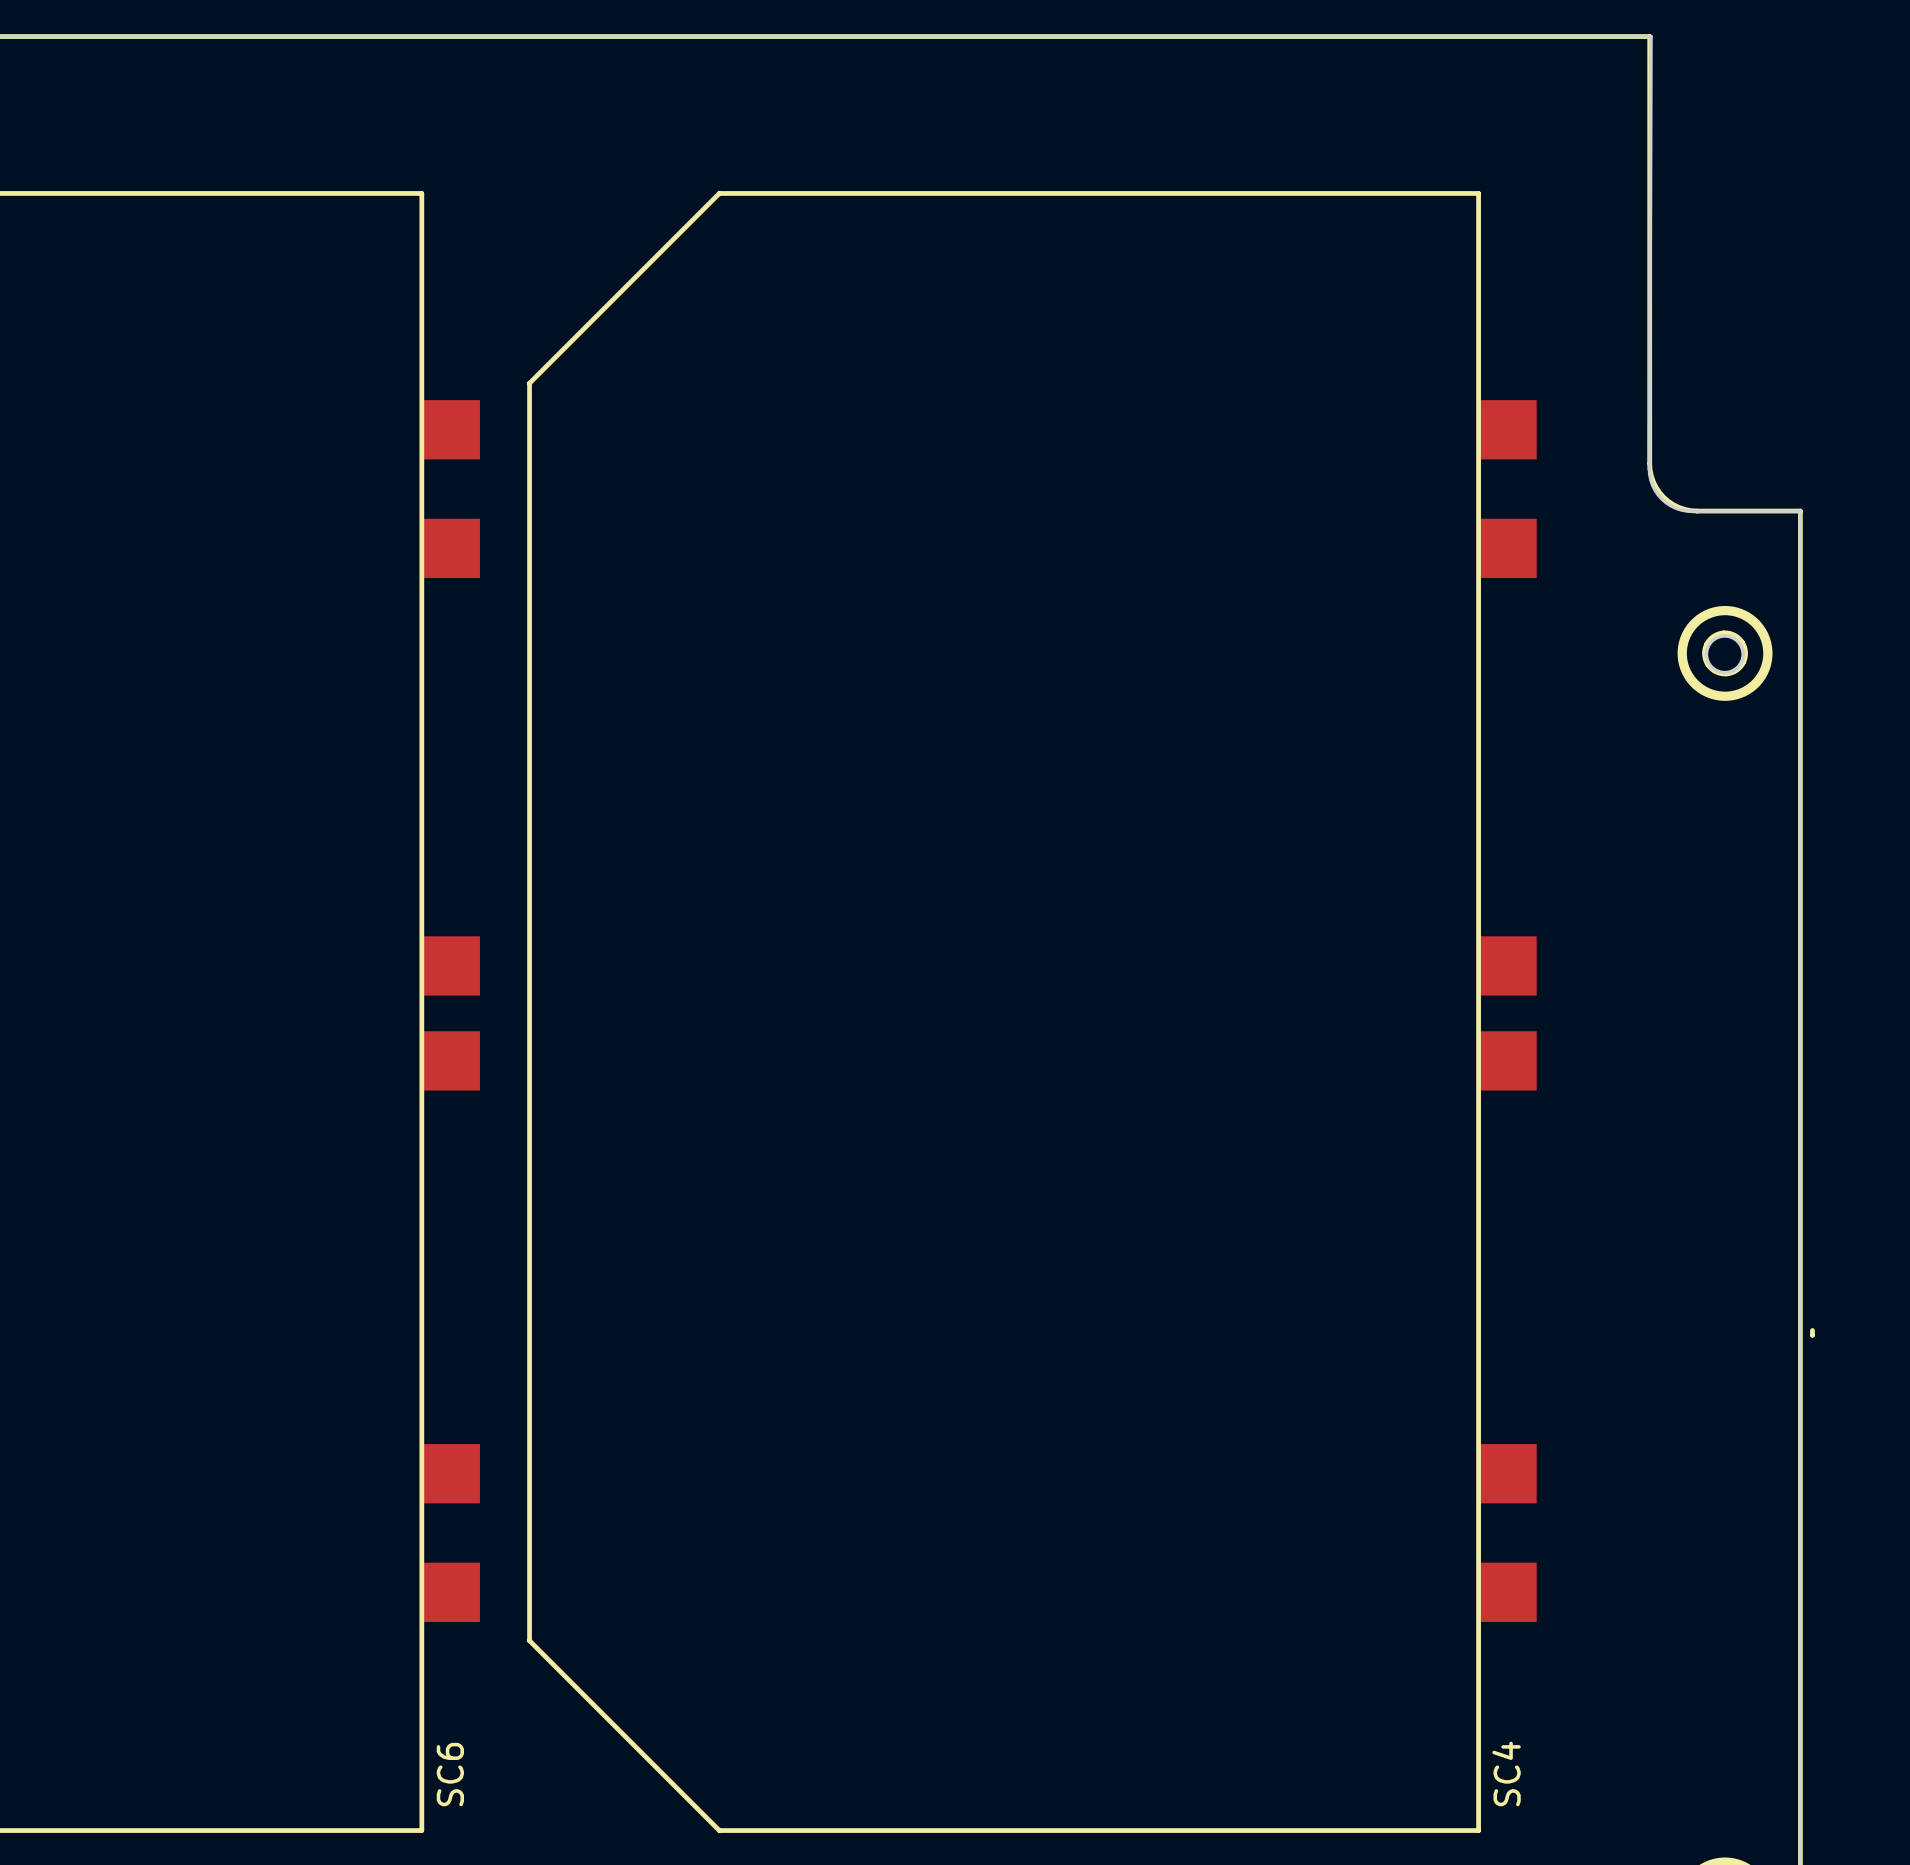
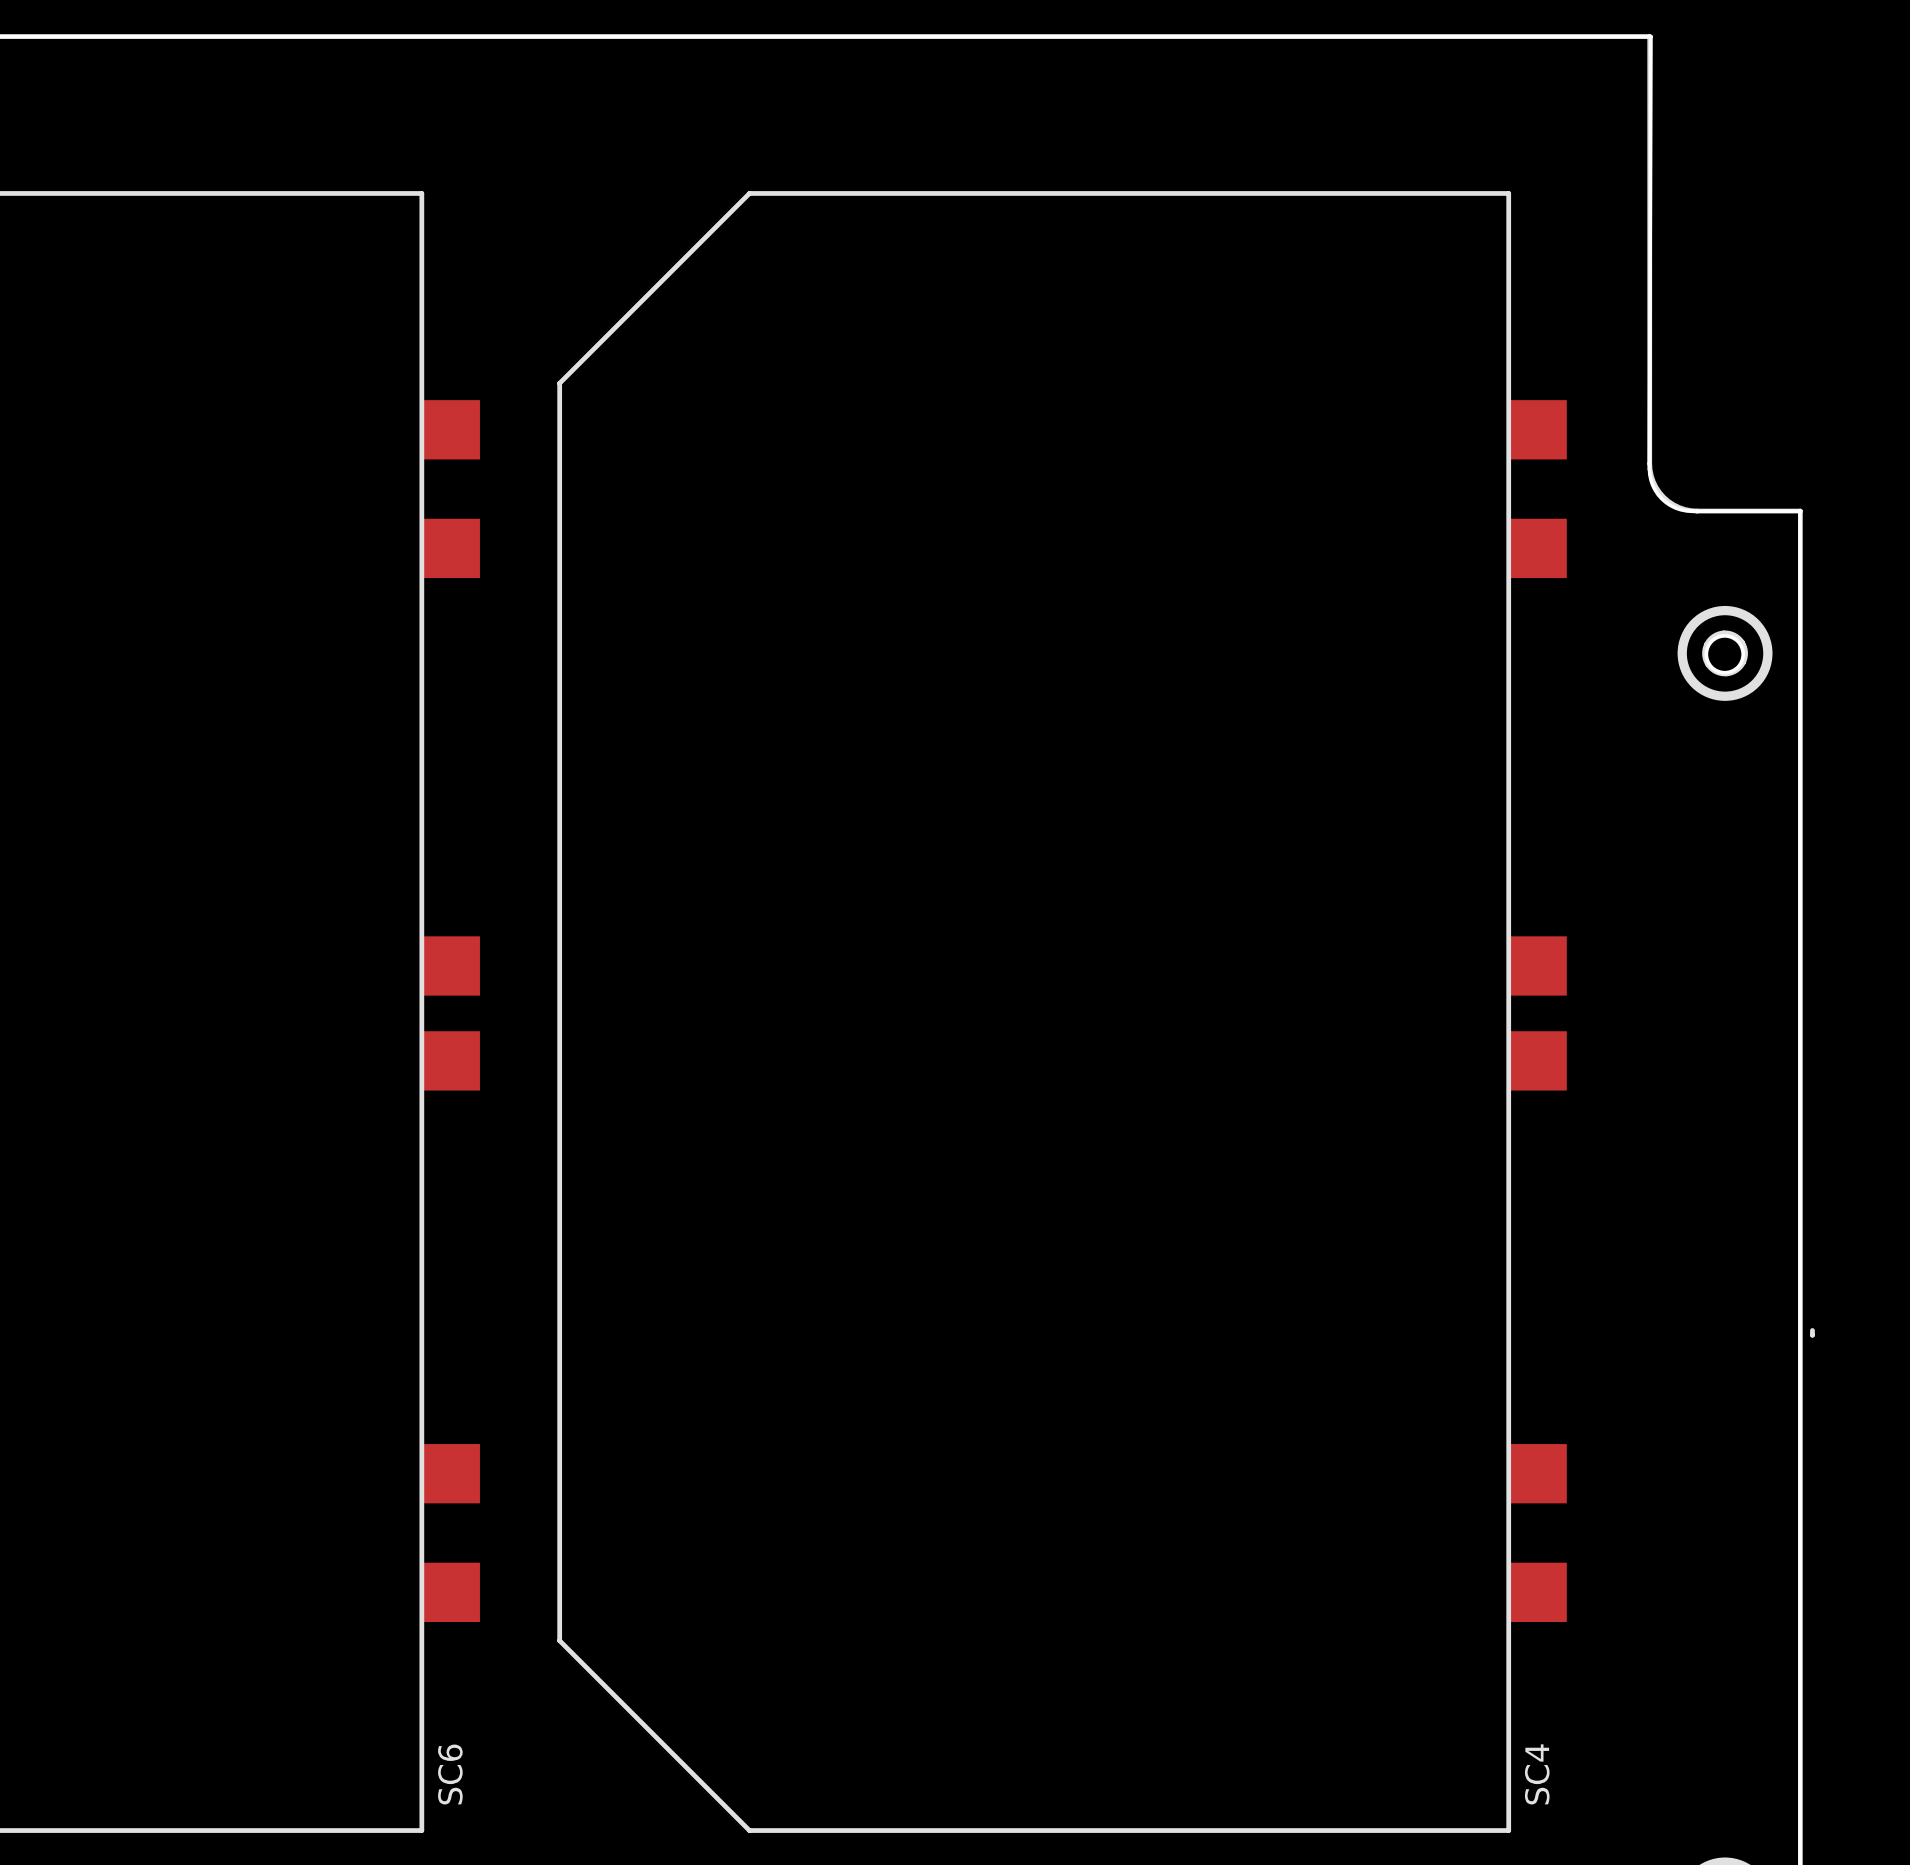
SC4 position: (1031, 1012) -> (1062, 1012)

